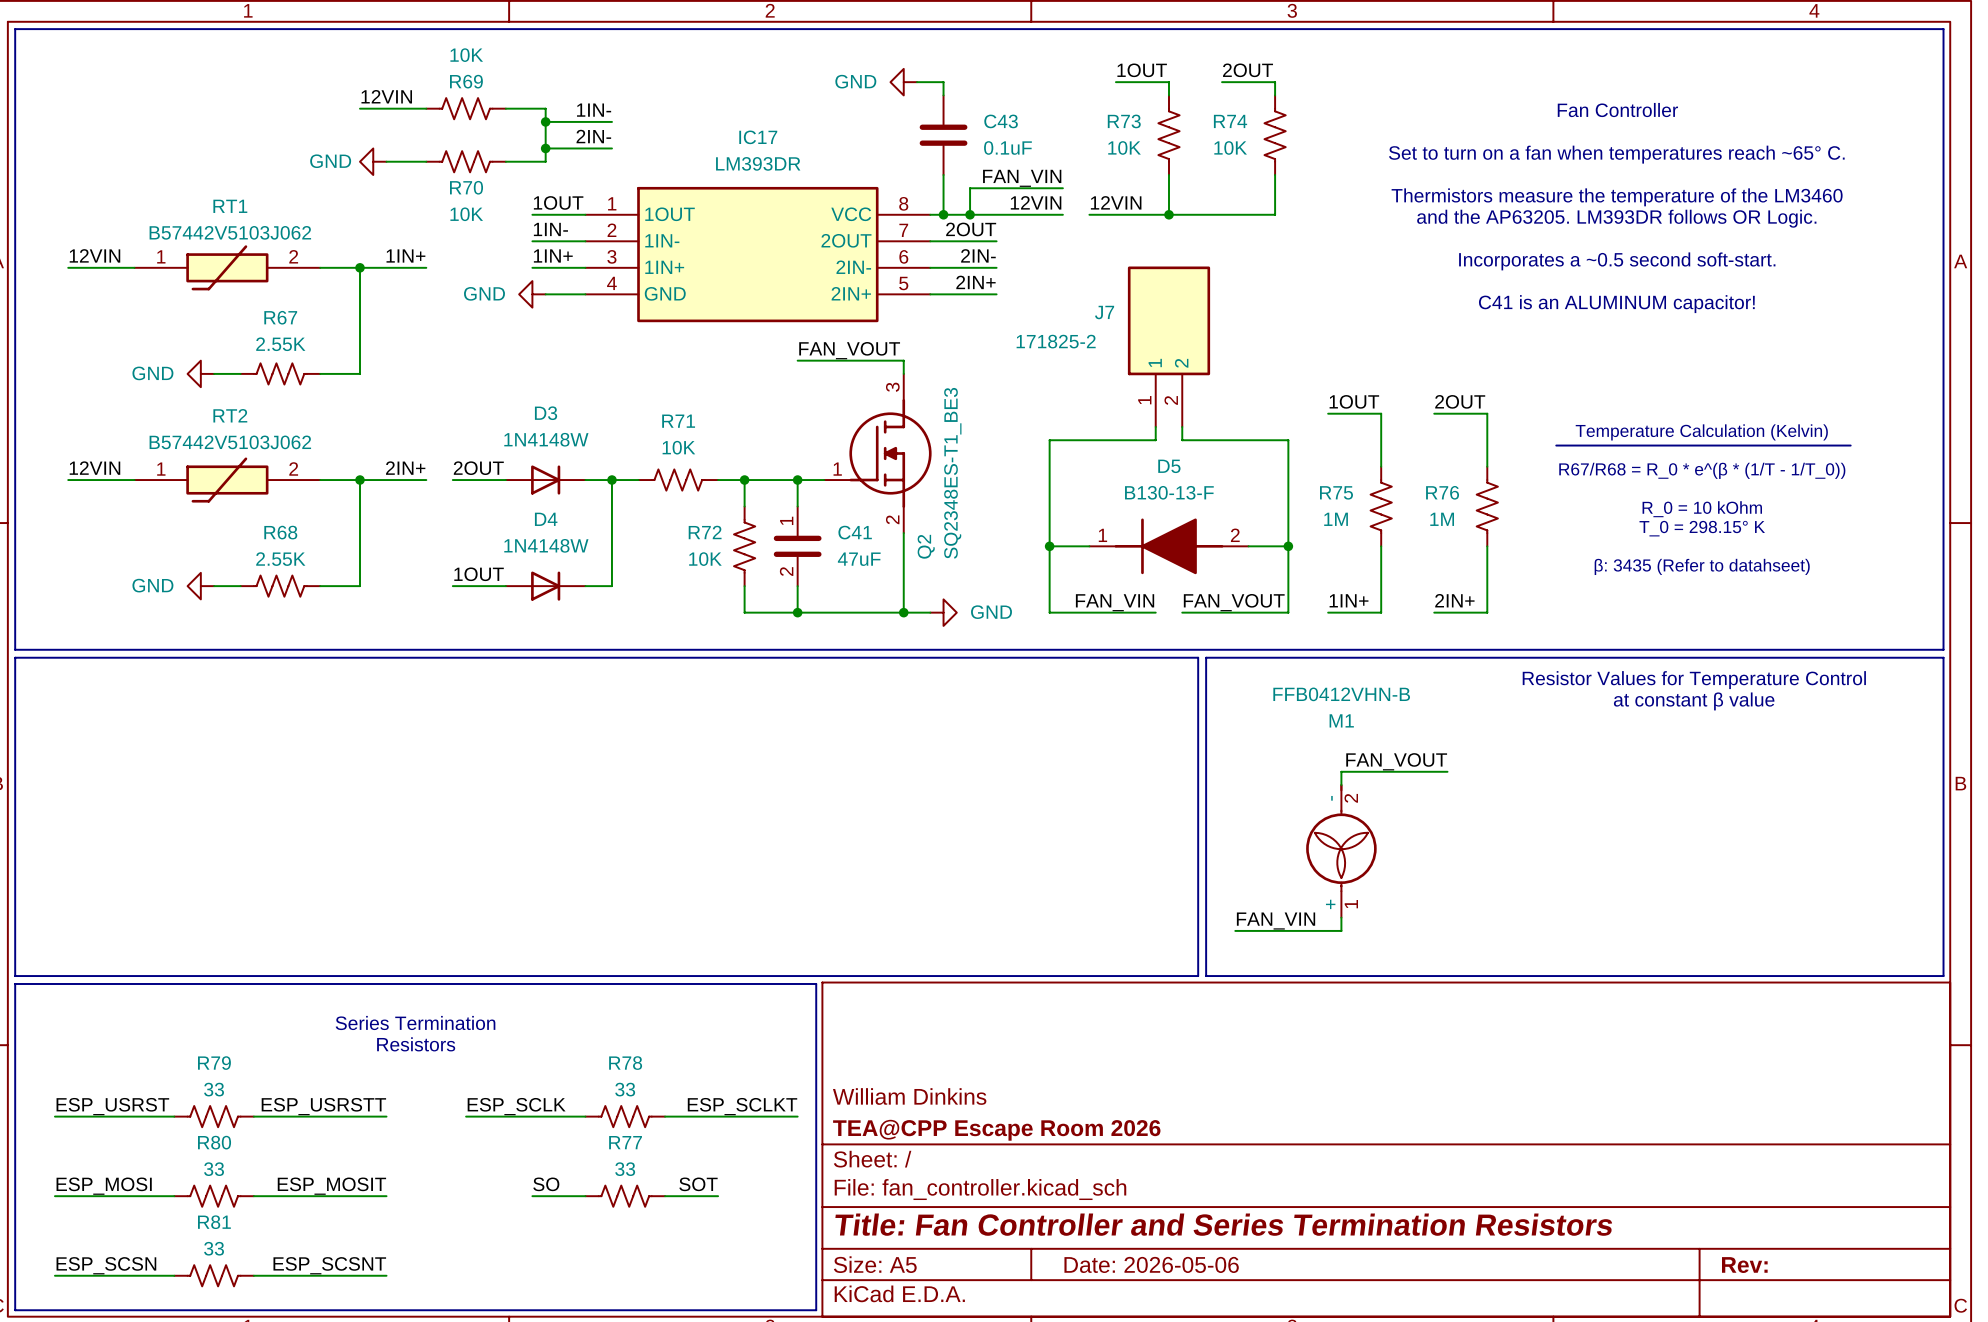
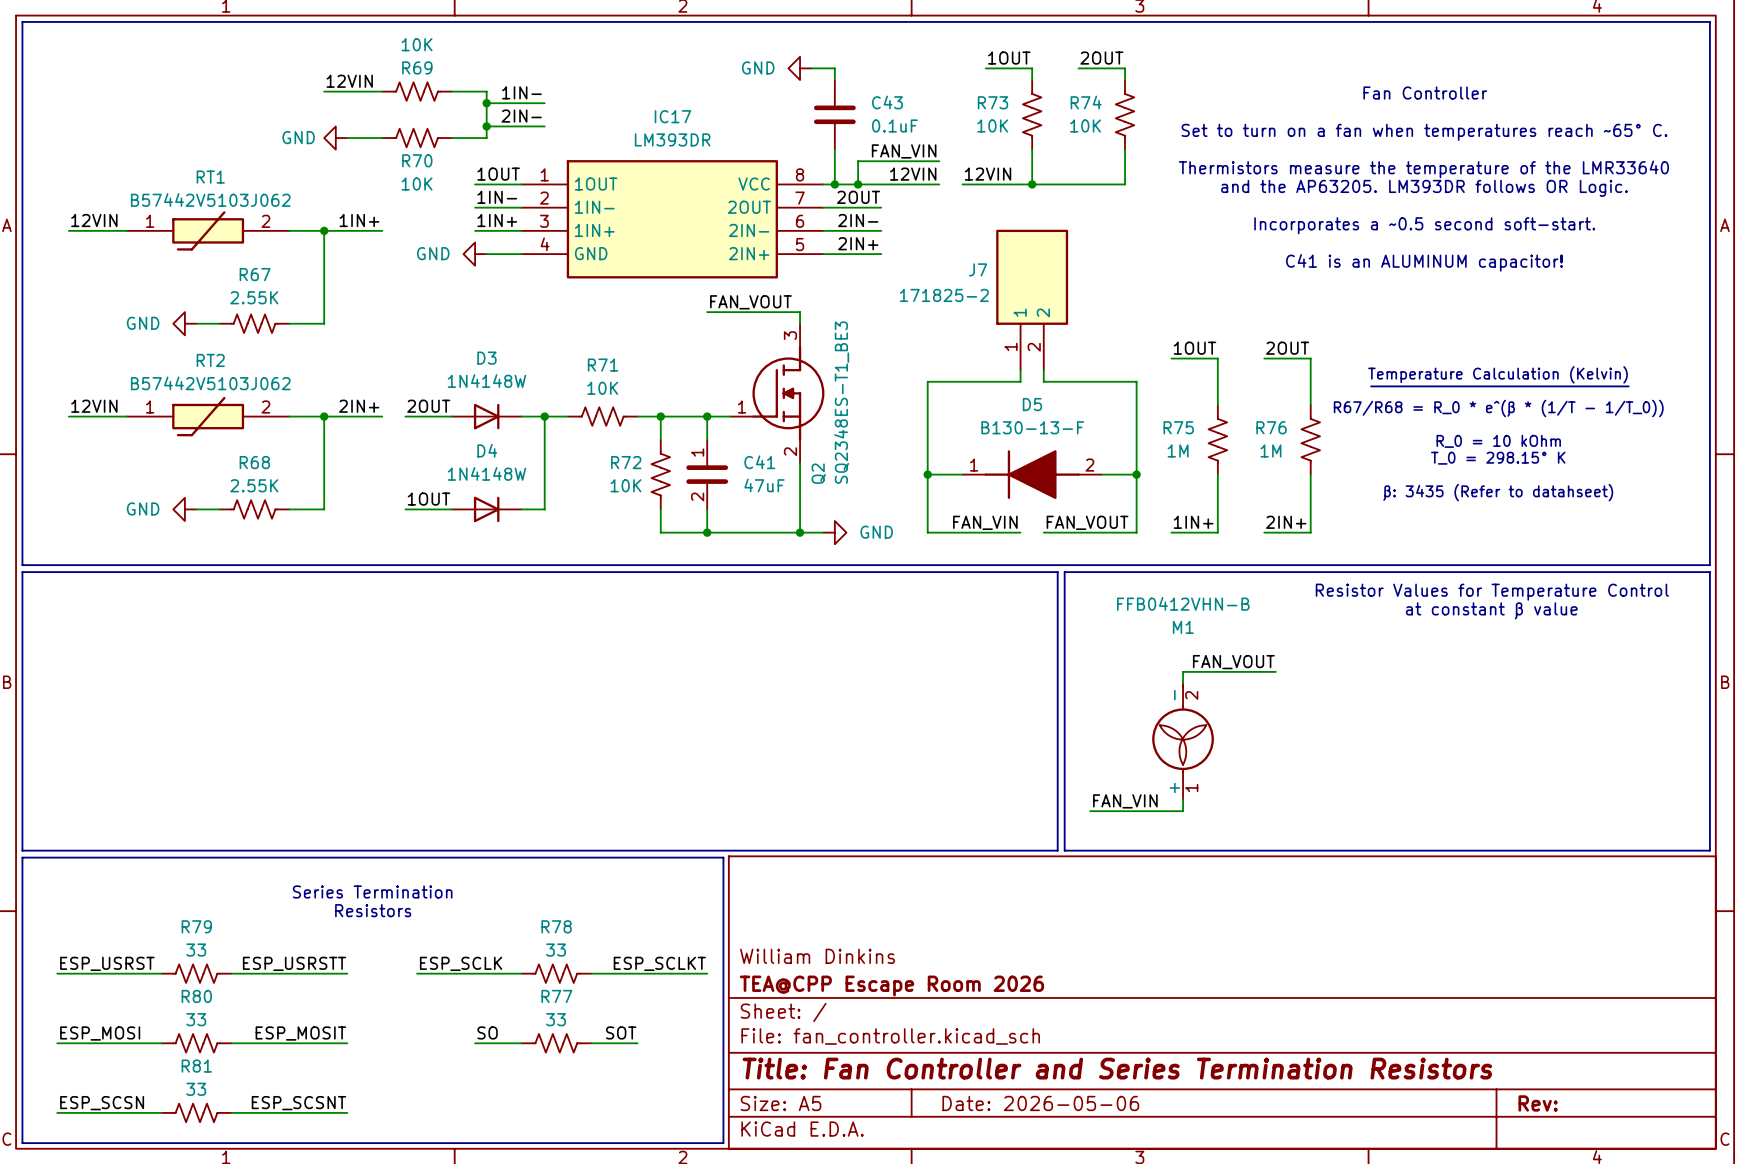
text: Thermistors measure the temperature of the LM3460 (1617, 197) -> Thermistors measure the temperature of the LMR33640 (1423, 169)

